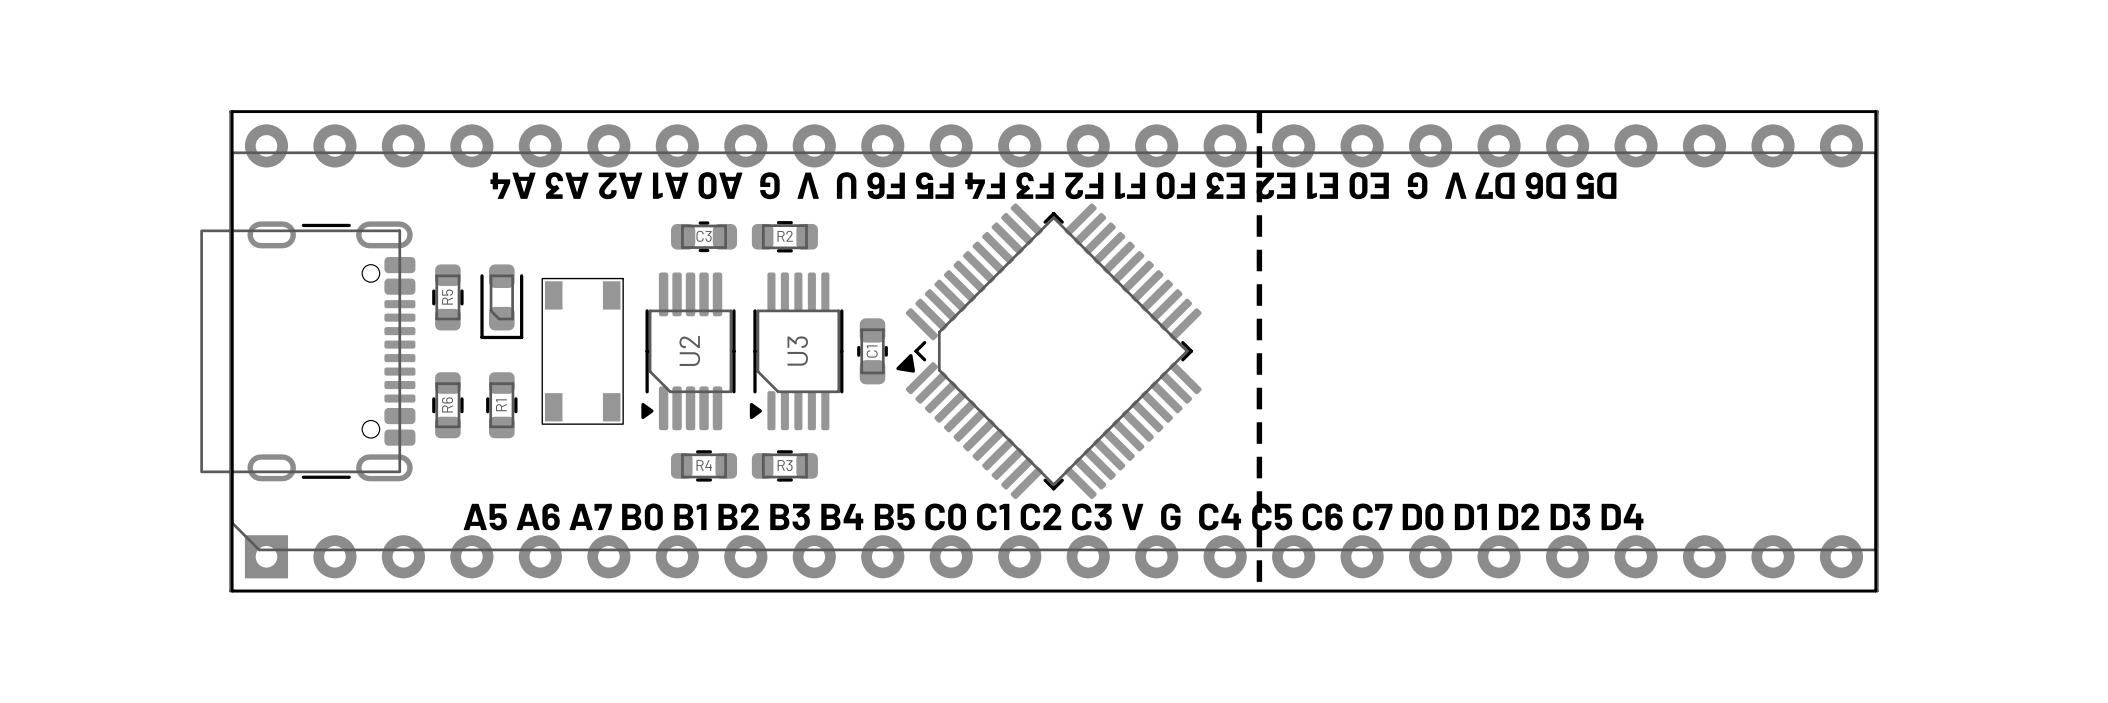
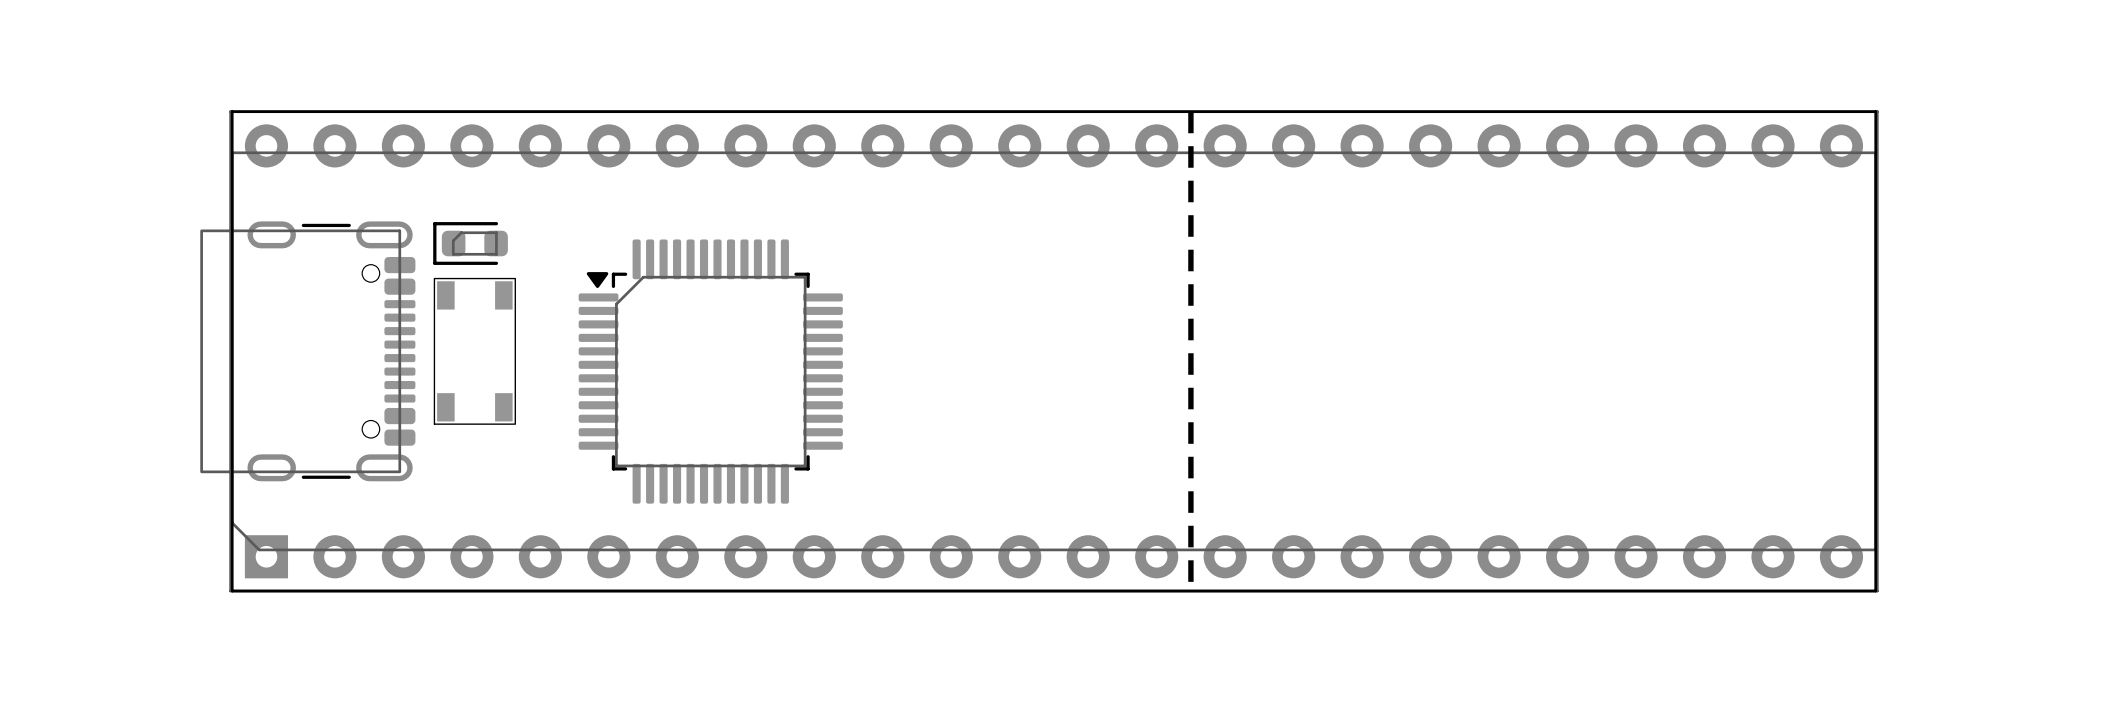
line: (1259, 111) (1259, 591) -> (1190, 111) (1190, 591)
text: D5 D6 D7 V G E0 E1 E2 E3 F0 F1 F2 F3 F4 F5 F6 U V G A0 A1 A2 A3 A4 (1053, 185) -> none
C3: (704, 236) -> none
R2: (784, 236) -> none
R5: (447, 297) -> none
part rotation: 0° (501, 301) -> 90° clockwise (470, 243)
part position: (501, 301) -> (470, 243)
part position: (582, 351) -> (474, 351)
U2: (688, 351) -> none
U3: (796, 351) -> none
C1: (872, 351) -> none
part: (1048, 351) -> none
part: none -> (710, 371)
R6: (447, 405) -> none
R1: (501, 405) -> none
R4: (704, 465) -> none
R3: (784, 465) -> none
text: A5 A6 A7 B0 B1 B2 B3 B4 B5 C0 C1 C2 C3 V G C4 C5 C6 C7 D0 D1 D2 D3 D4 (1053, 517) -> none

